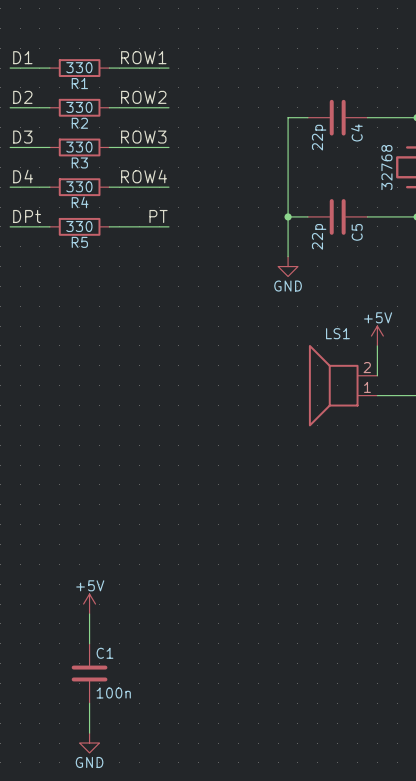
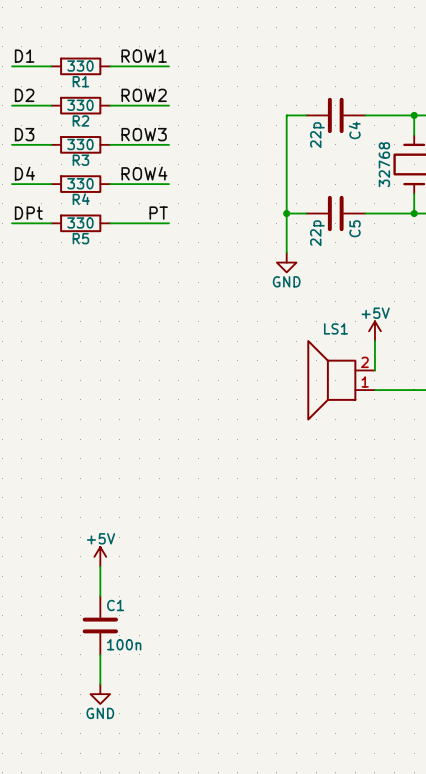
power symbol position: +5V (89, 604) -> +5V (100, 556)
wire: (89, 613) (89, 643) -> (100, 566) (100, 596)
C1 position: (89, 673) -> (100, 625)
wire: (89, 703) (89, 733) -> (100, 654) (100, 684)
power symbol position: GND (89, 743) -> GND (100, 694)

